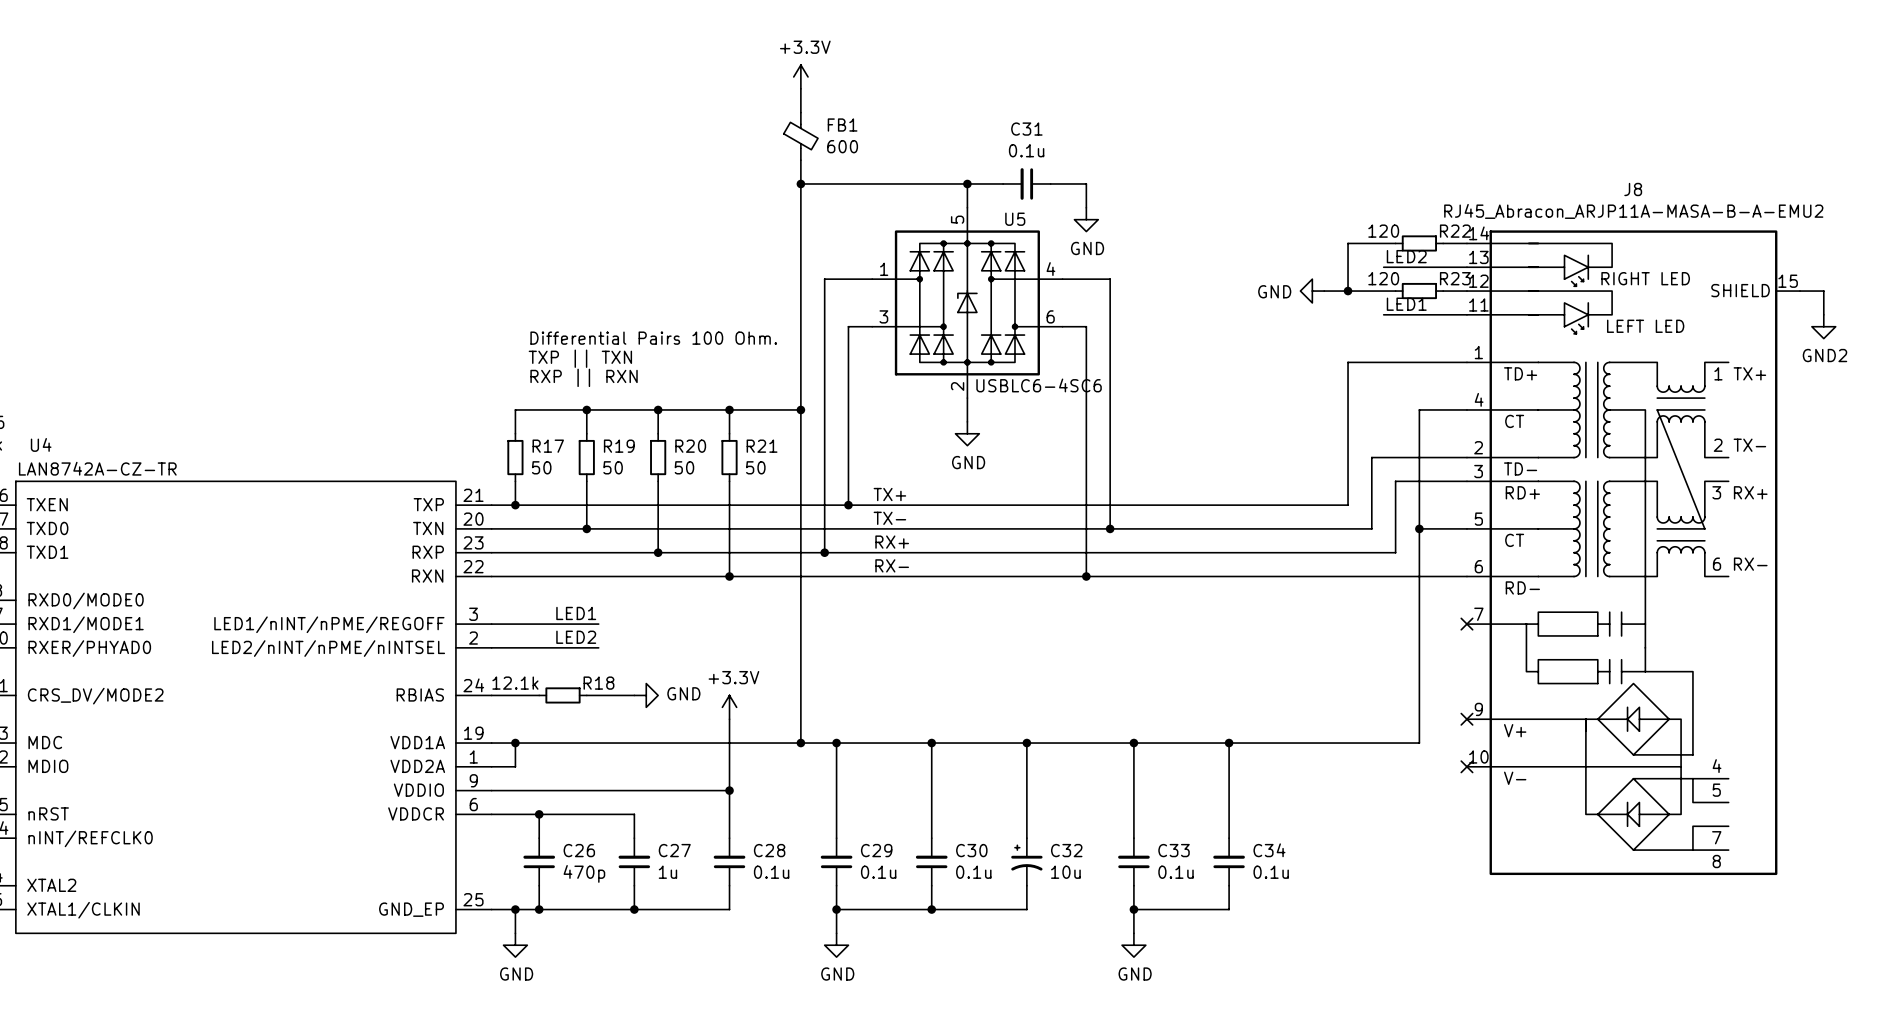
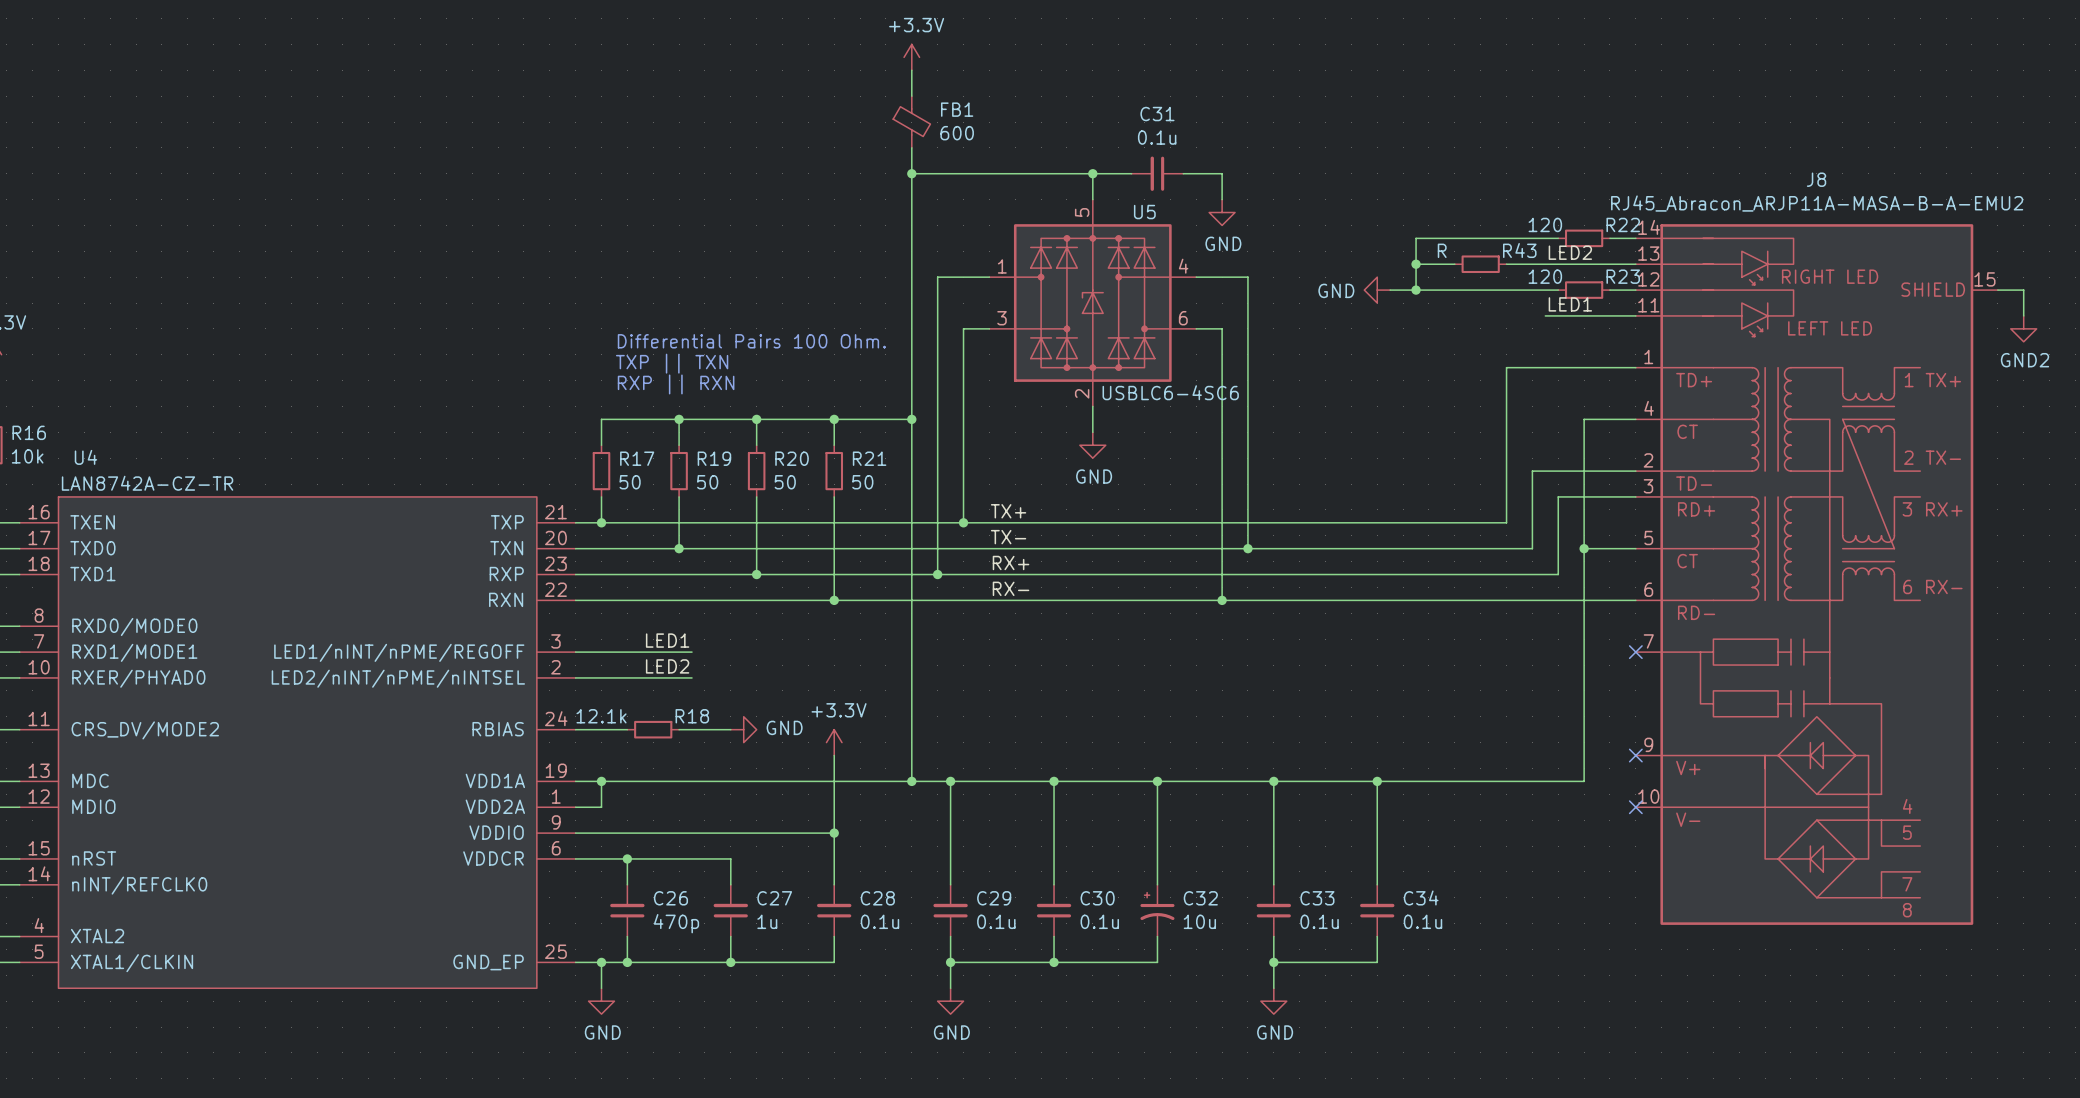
wire: (1348, 243) (1348, 291) -> (1506, 238) (1416, 238) (1416, 290)
wire: none -> (1416, 264) (1454, 264)
junction: none -> (1416, 264)
R43: none -> R (1480, 264)
wire: none -> (1506, 264) (1545, 264)
wire: none -> (1390, 290) (1480, 290)
junction: none -> (1416, 290)
power symbol position: GND (1312, 291) -> GND (1377, 290)
junction: (1348, 291) -> none

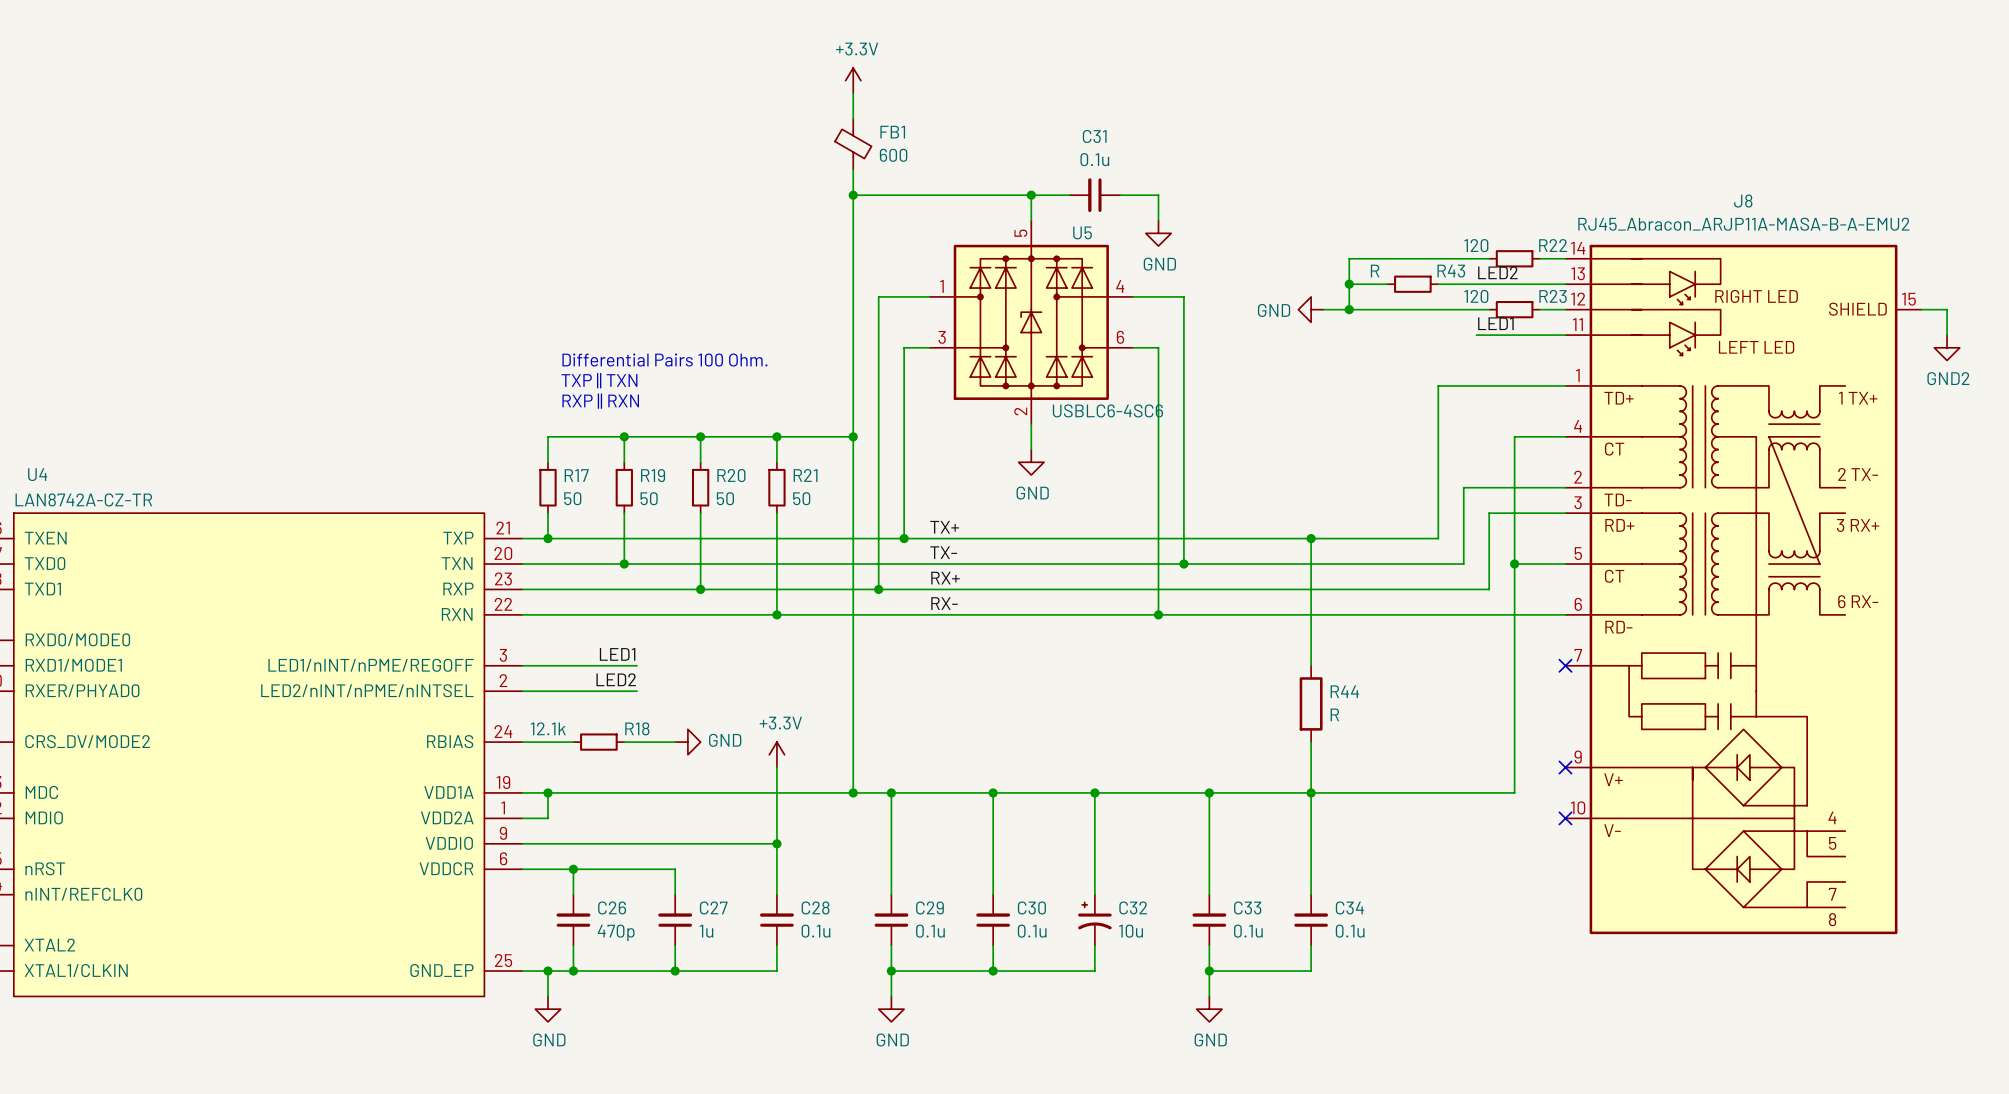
wire: none -> (1311, 538) (1311, 665)
junction: none -> (1311, 538)
R44: none -> R (1311, 703)
wire: none -> (1311, 742) (1311, 792)

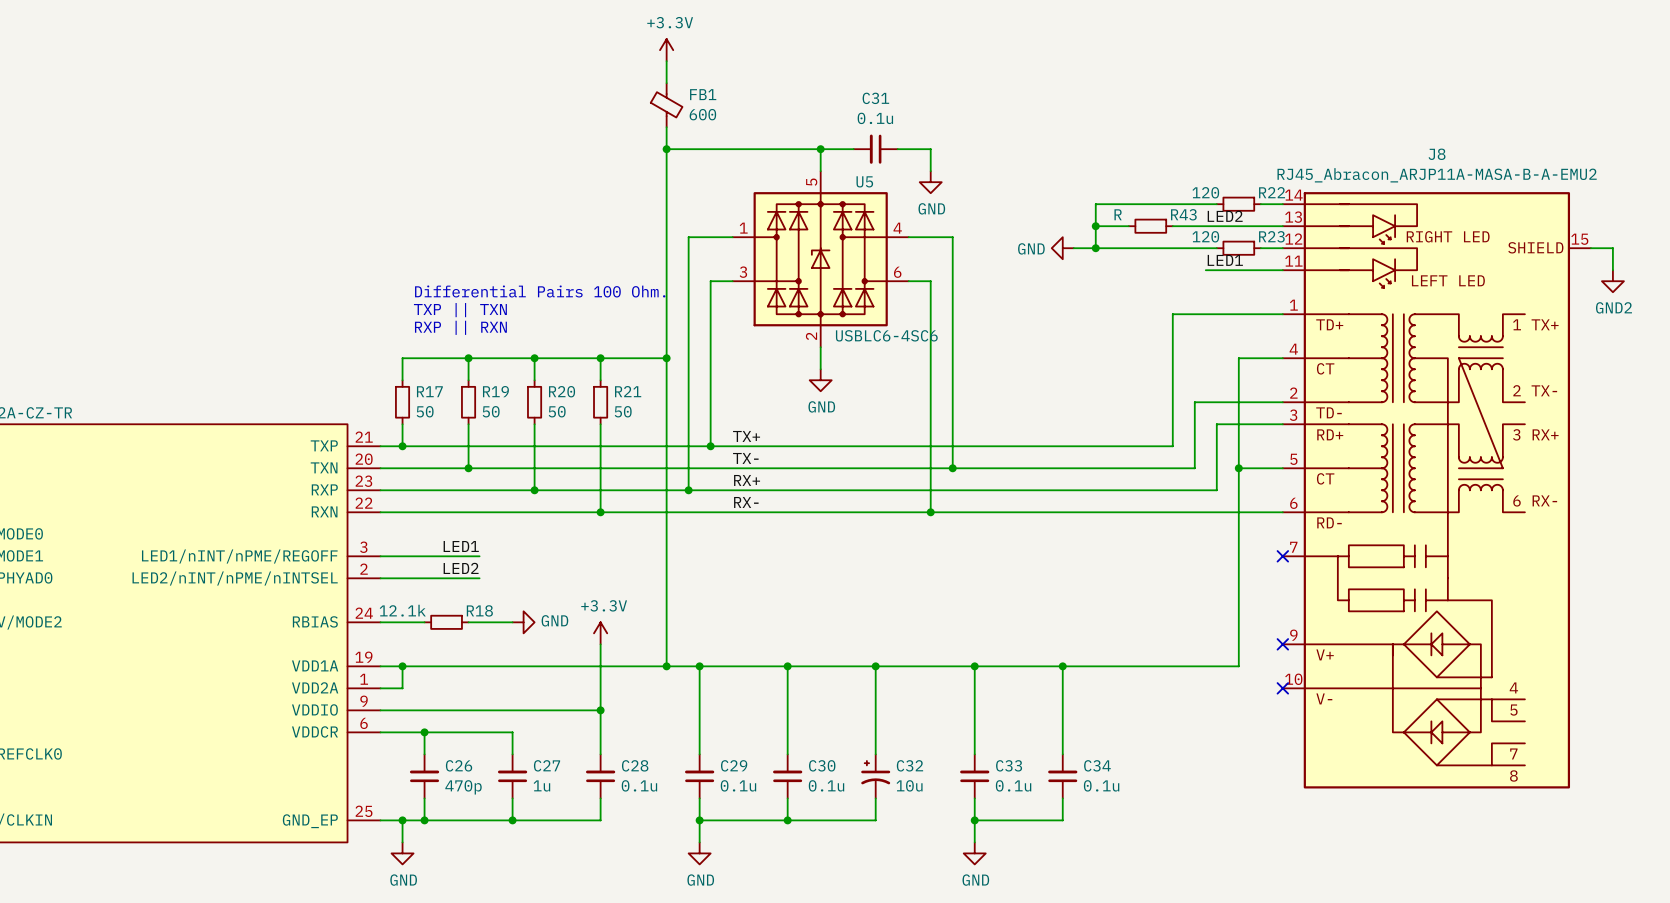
wire: (1311, 538) (1311, 665) -> none
junction: (1311, 538) -> none
R44: R (1311, 703) -> none
wire: (1311, 742) (1311, 792) -> none

